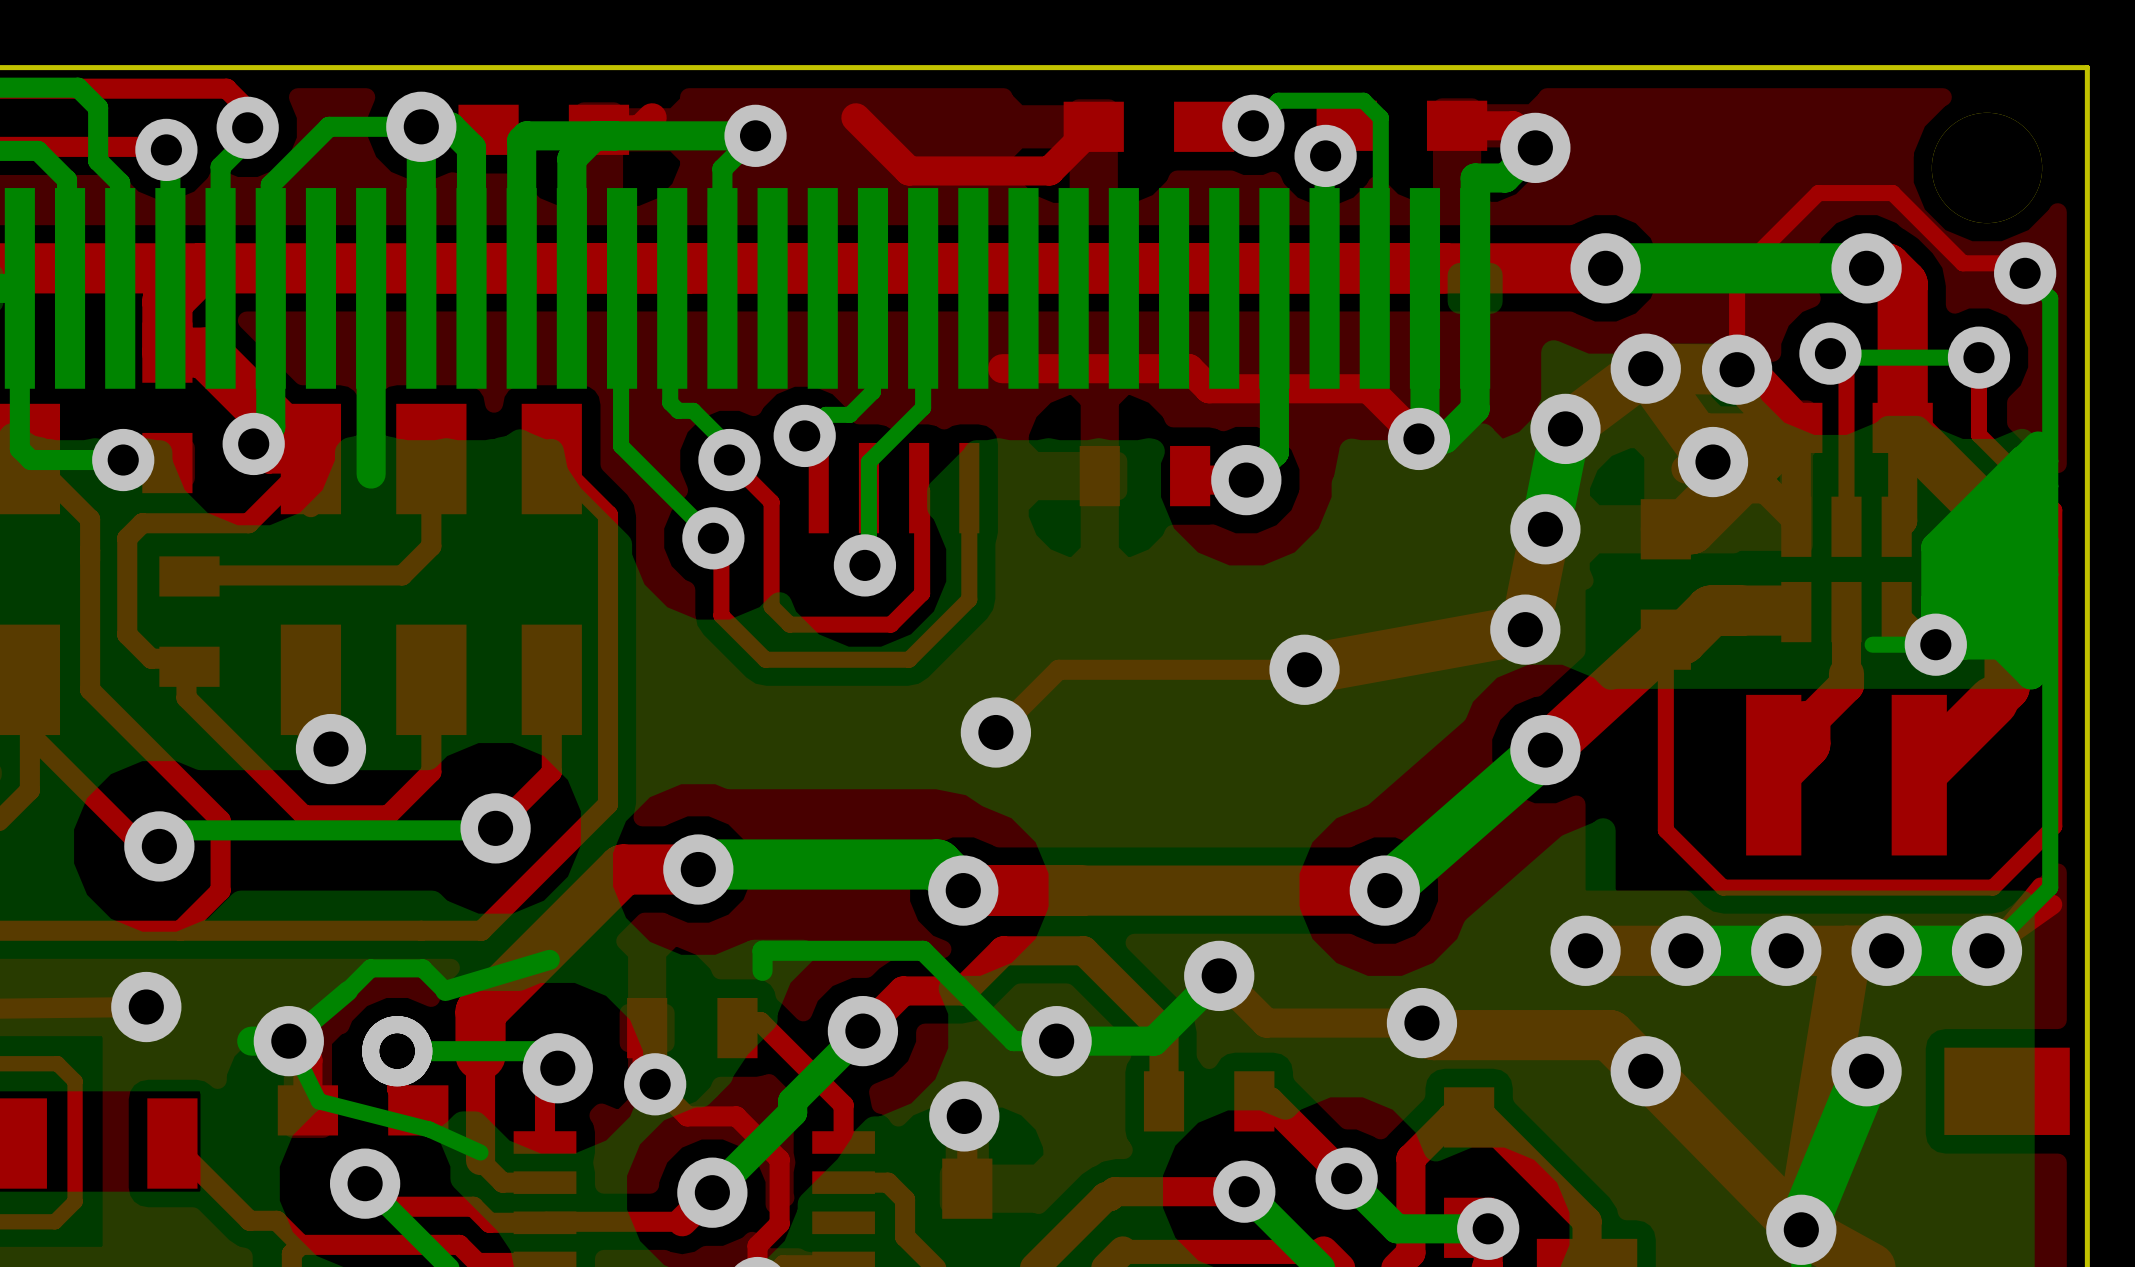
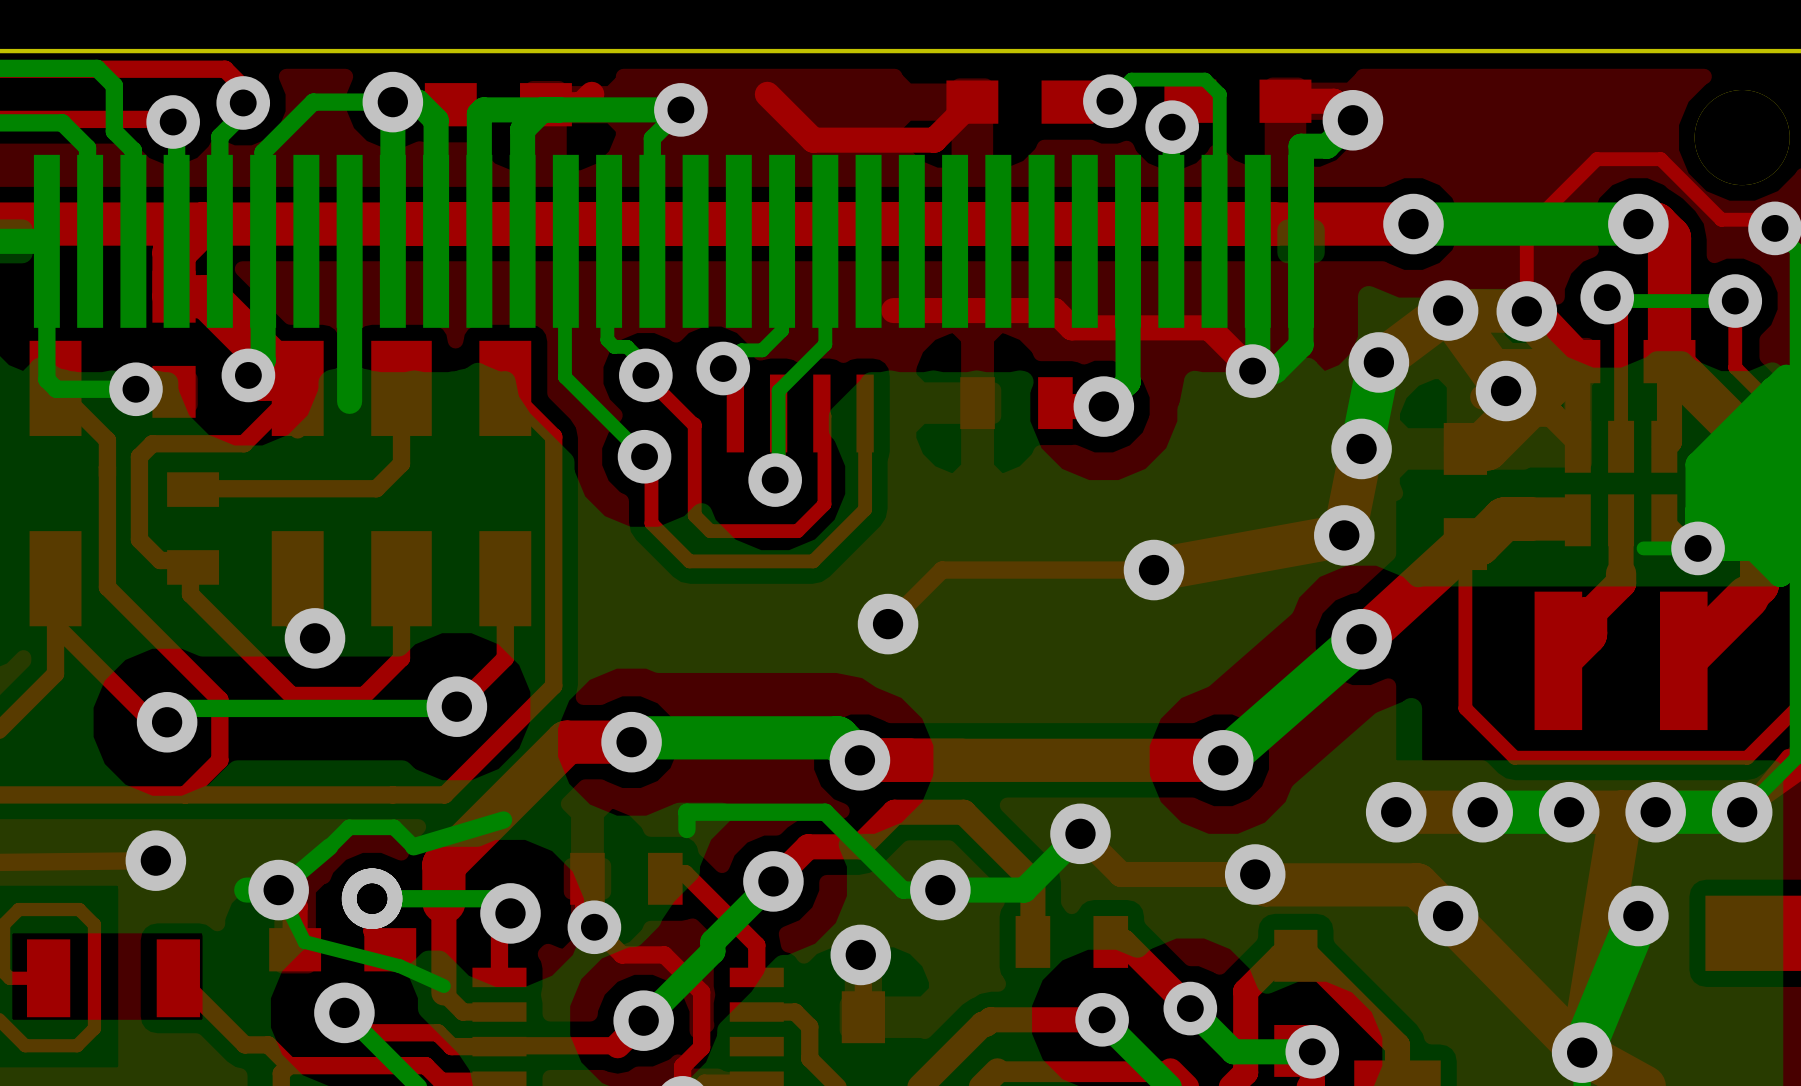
via position: (729, 460) -> (645, 375)

